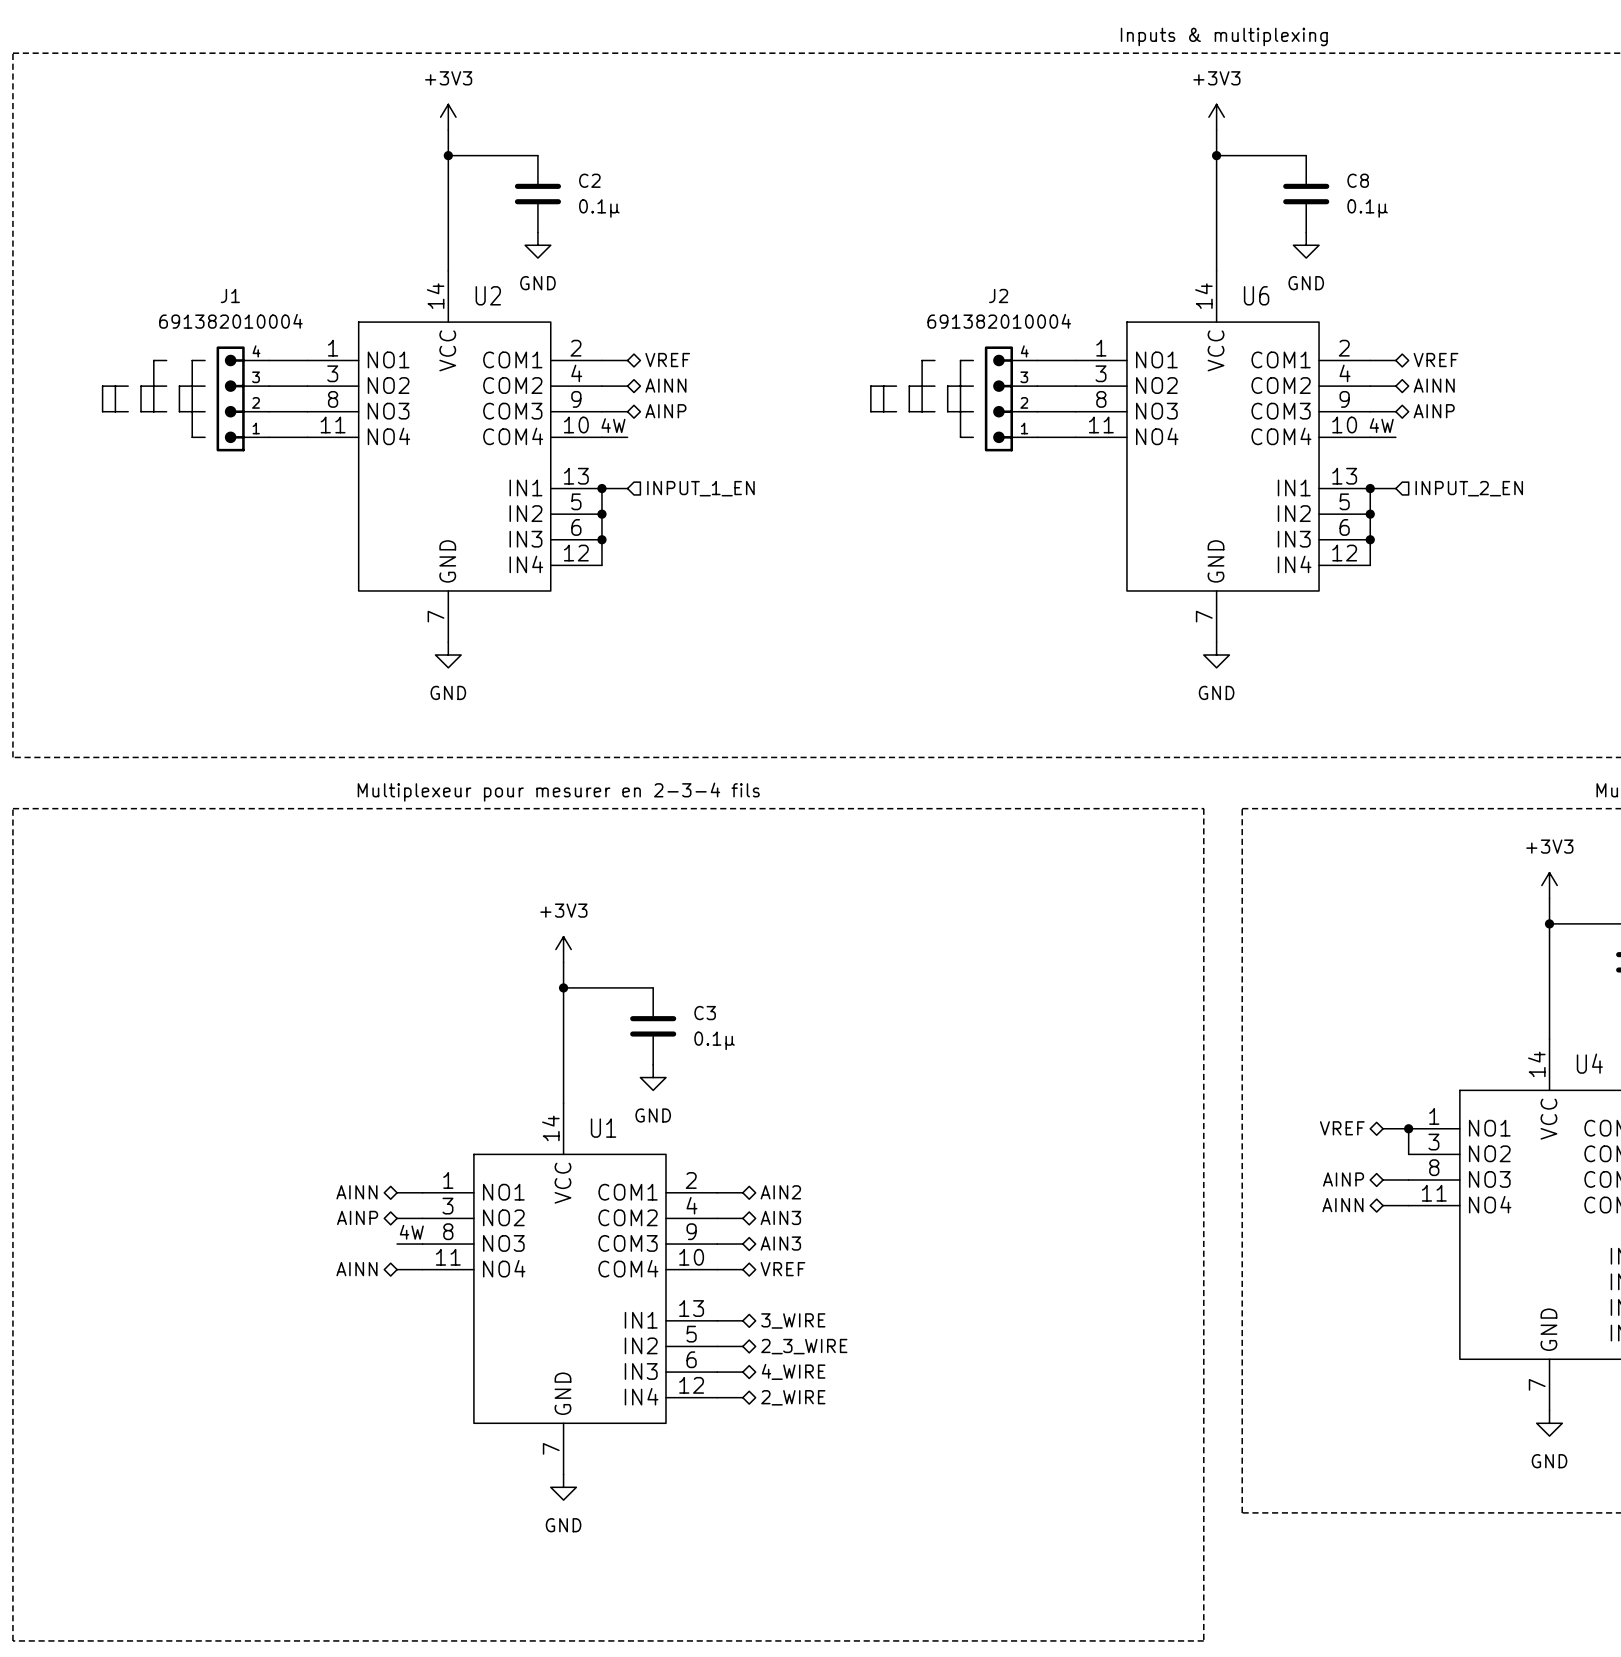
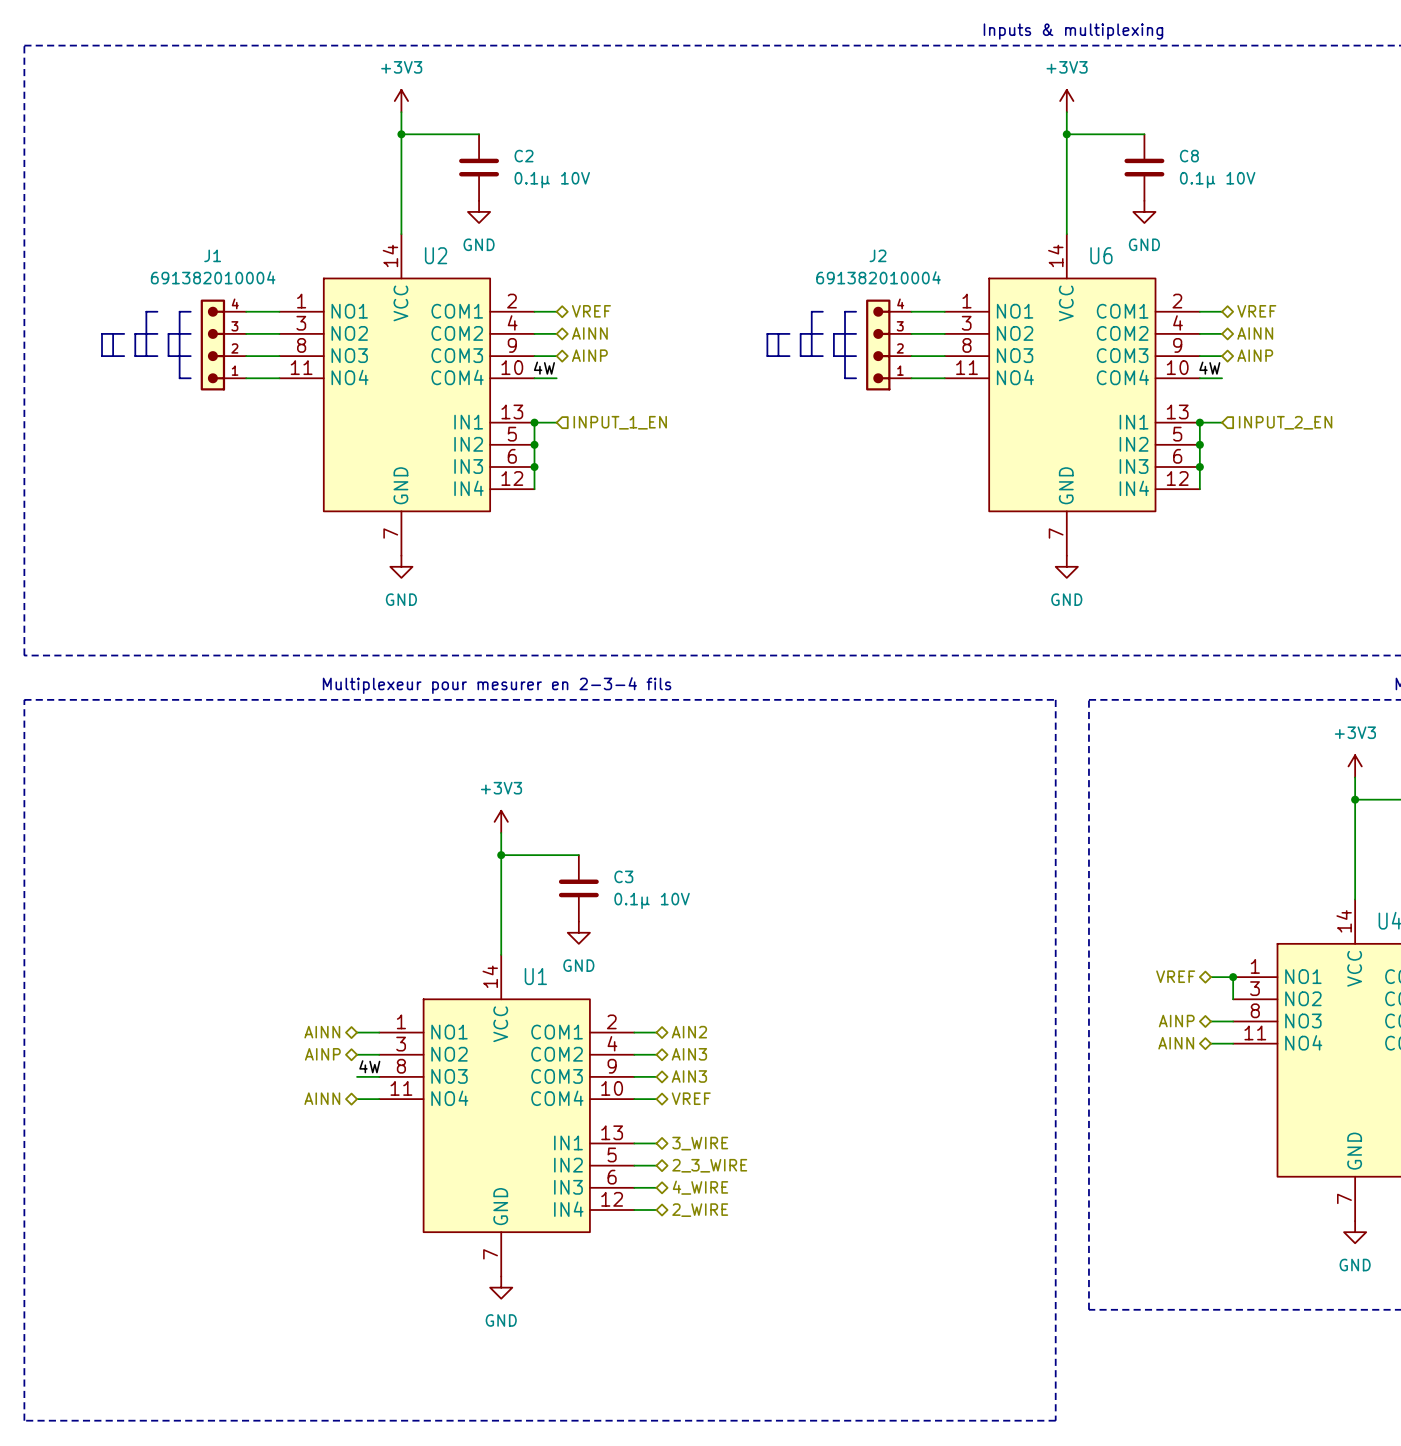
C2 value: 0.1µ (599, 208) -> 0.1µ 10V (552, 180)
C8 value: 0.1µ (1367, 208) -> 0.1µ 10V (1217, 180)
C3 value: 0.1µ (714, 1040) -> 0.1µ 10V (652, 900)

